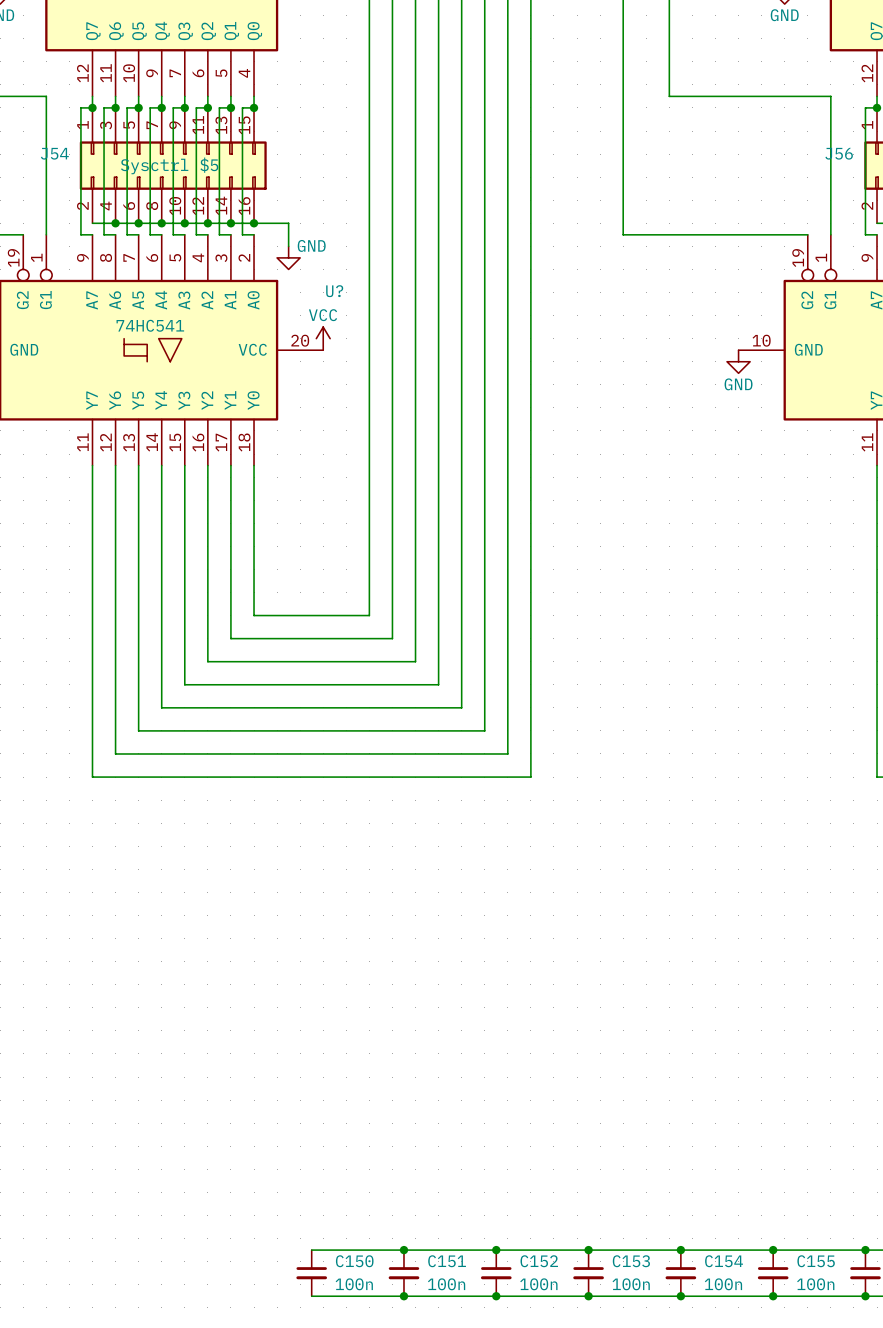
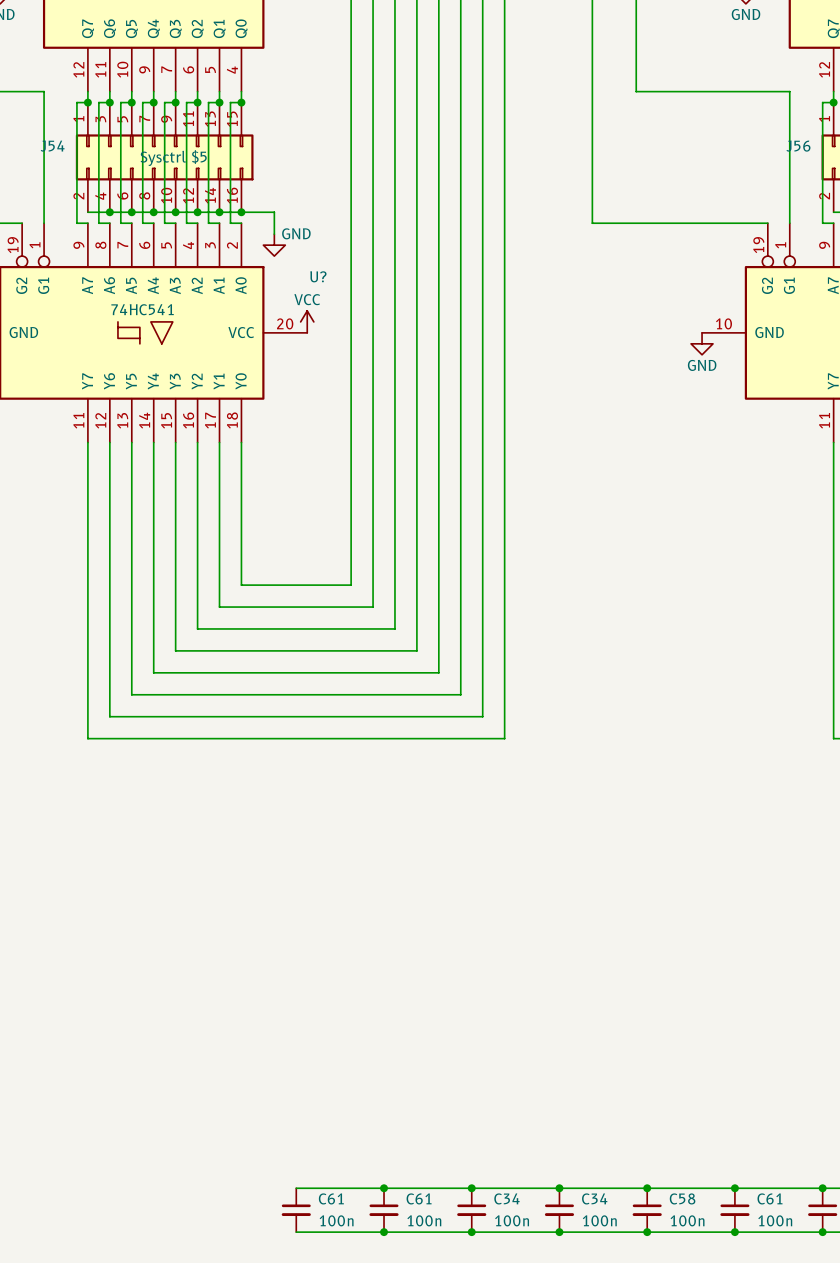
C150 name: C150 (354, 1261) -> C61 (331, 1198)
C151 name: C151 (447, 1261) -> C61 (419, 1198)
C152 name: C152 (539, 1261) -> C34 (506, 1198)
C153 name: C153 (631, 1261) -> C34 (594, 1198)
C154 name: C154 (724, 1261) -> C58 (682, 1198)
C155 name: C155 (816, 1261) -> C61 (769, 1198)

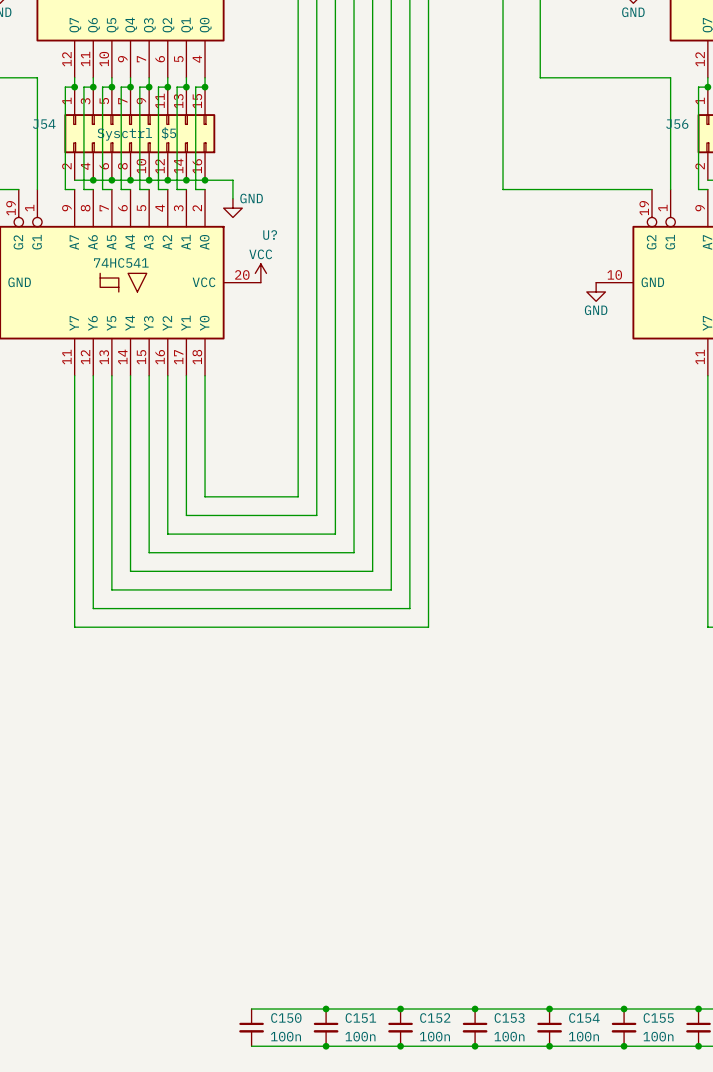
C61 name: C61 (331, 1198) -> C150 (286, 1018)
C61 name: C61 (419, 1198) -> C151 (360, 1018)
C34 name: C34 (506, 1198) -> C152 (435, 1018)
C34 name: C34 (594, 1198) -> C153 (509, 1018)
C58 name: C58 (682, 1198) -> C154 (584, 1018)
C61 name: C61 (769, 1198) -> C155 (658, 1018)

